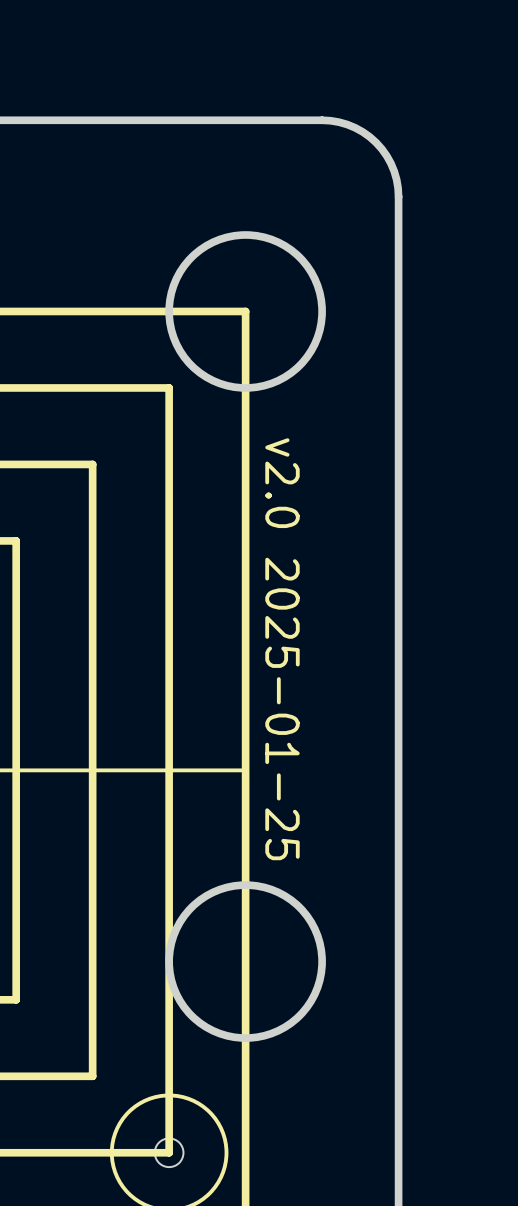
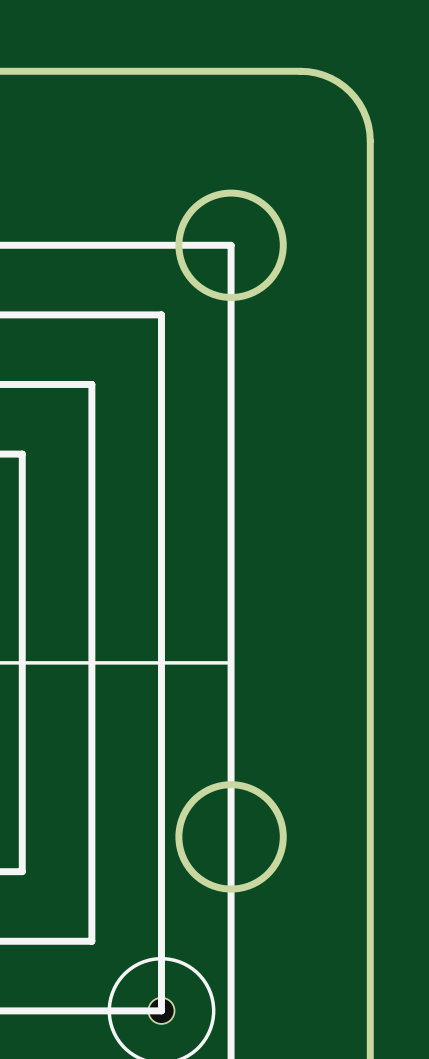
round board edge size: [165, 231, 326, 392] -> [175, 189, 287, 301]
text: v2.0 2025-01-25 (282, 649) -> none
round board edge size: [165, 881, 326, 1042] -> [175, 781, 287, 893]

